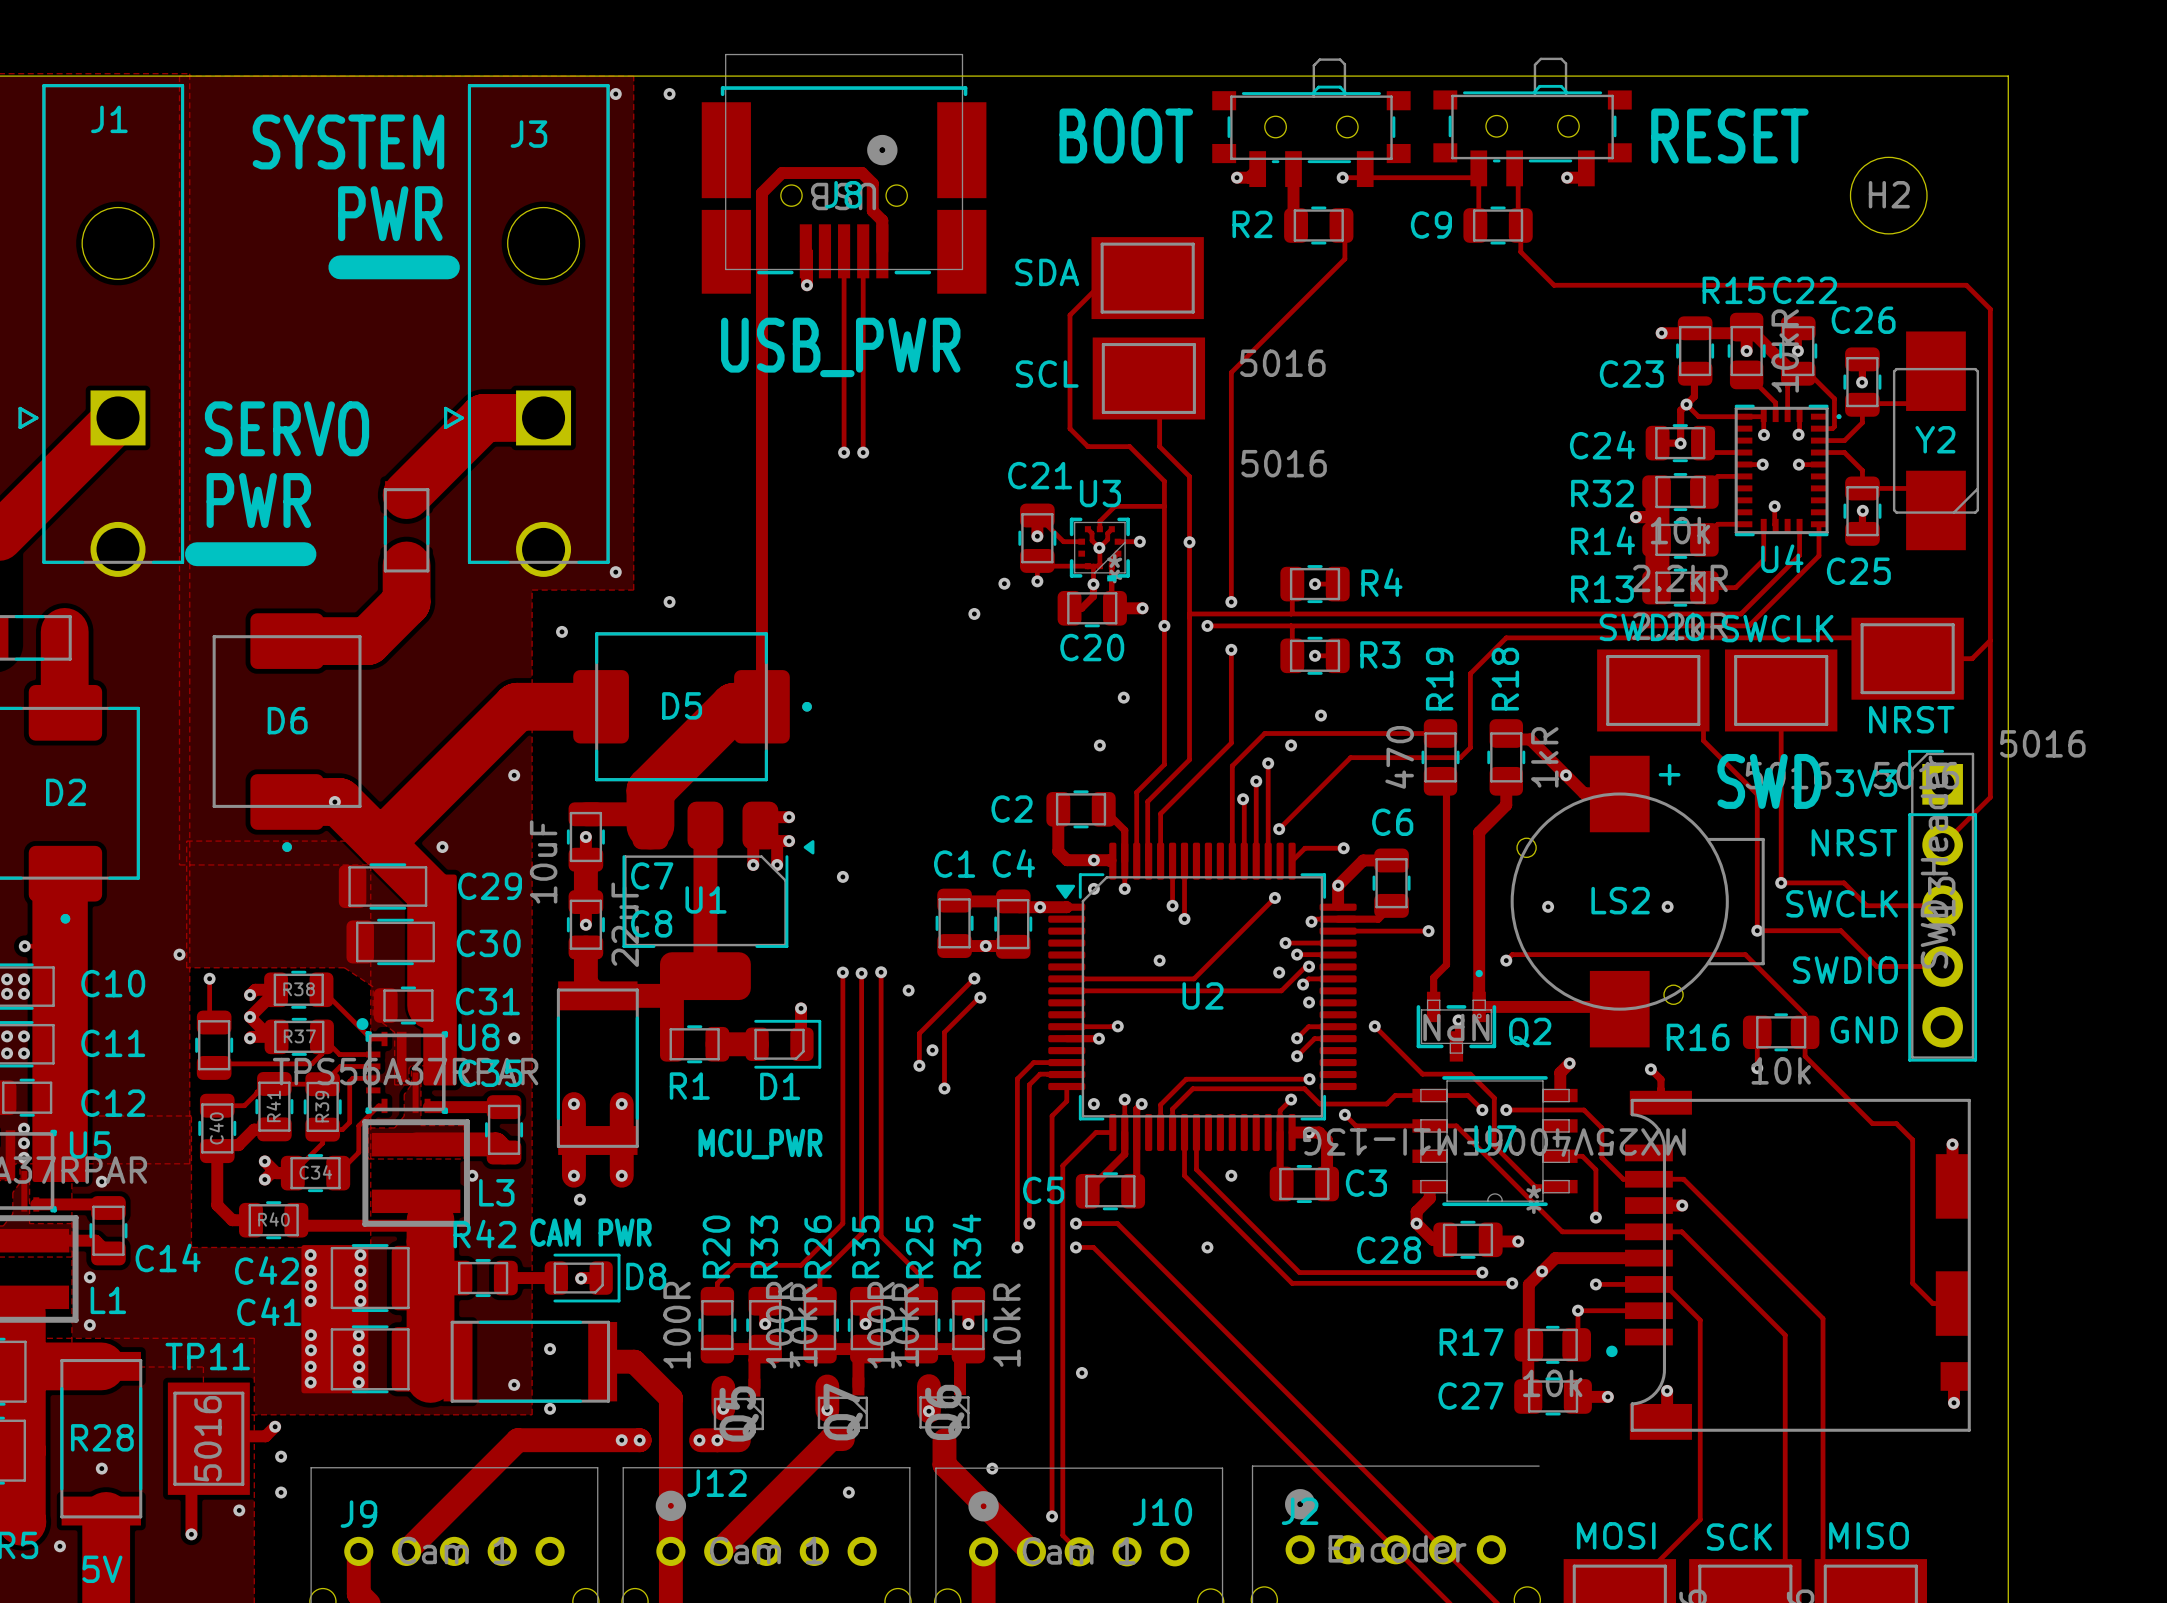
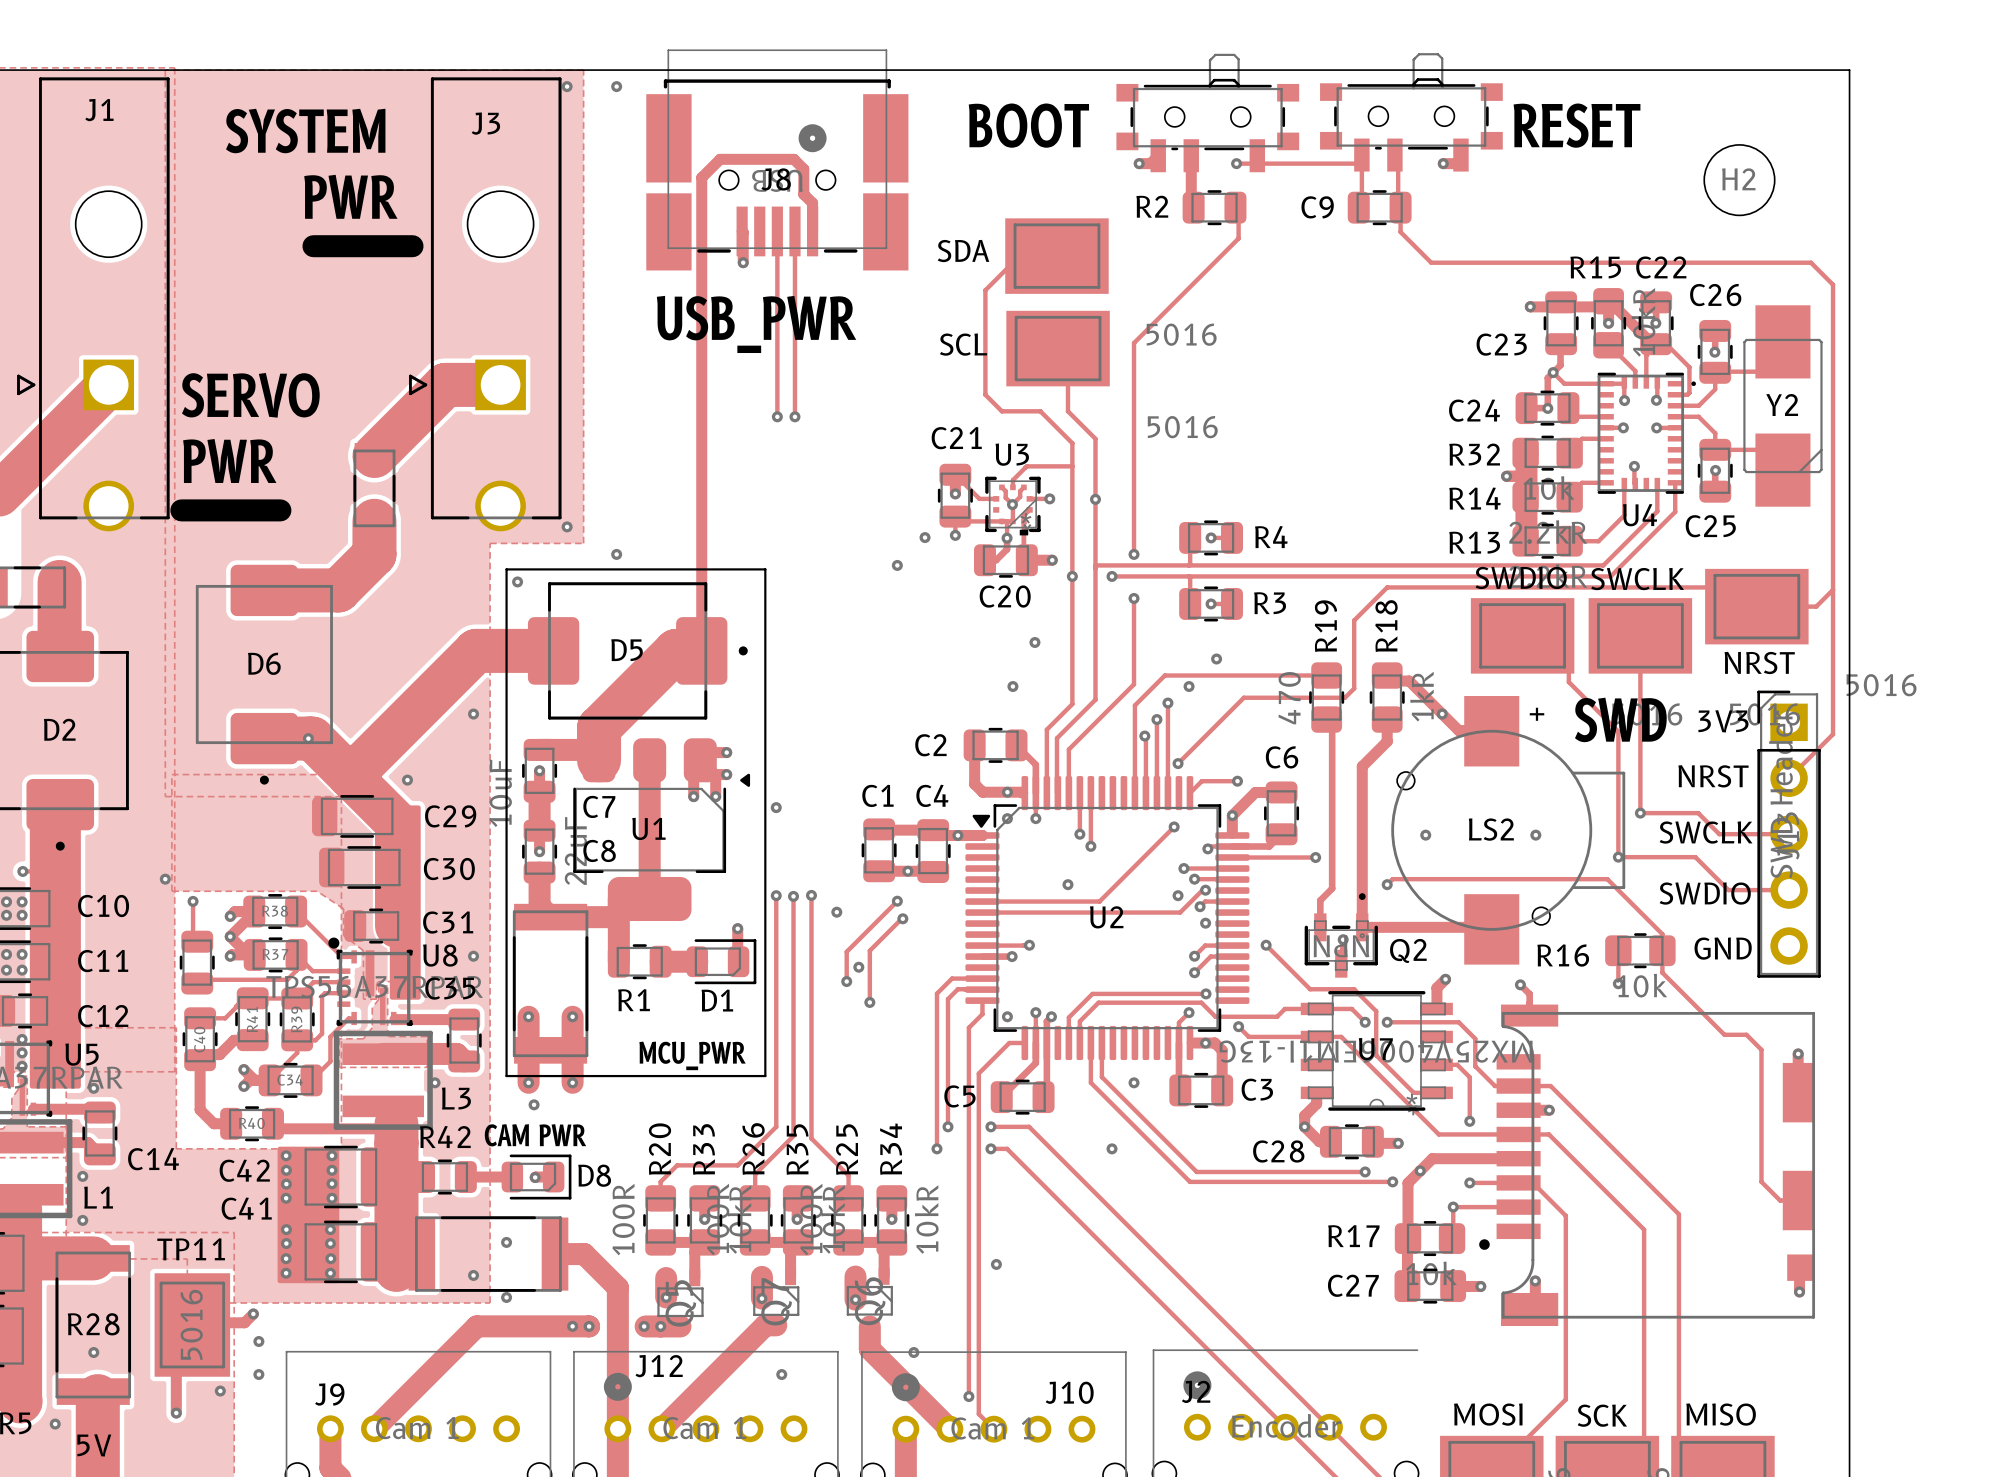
line: none -> (506, 569) (765, 569) (765, 1076) (506, 1076) (506, 569)

